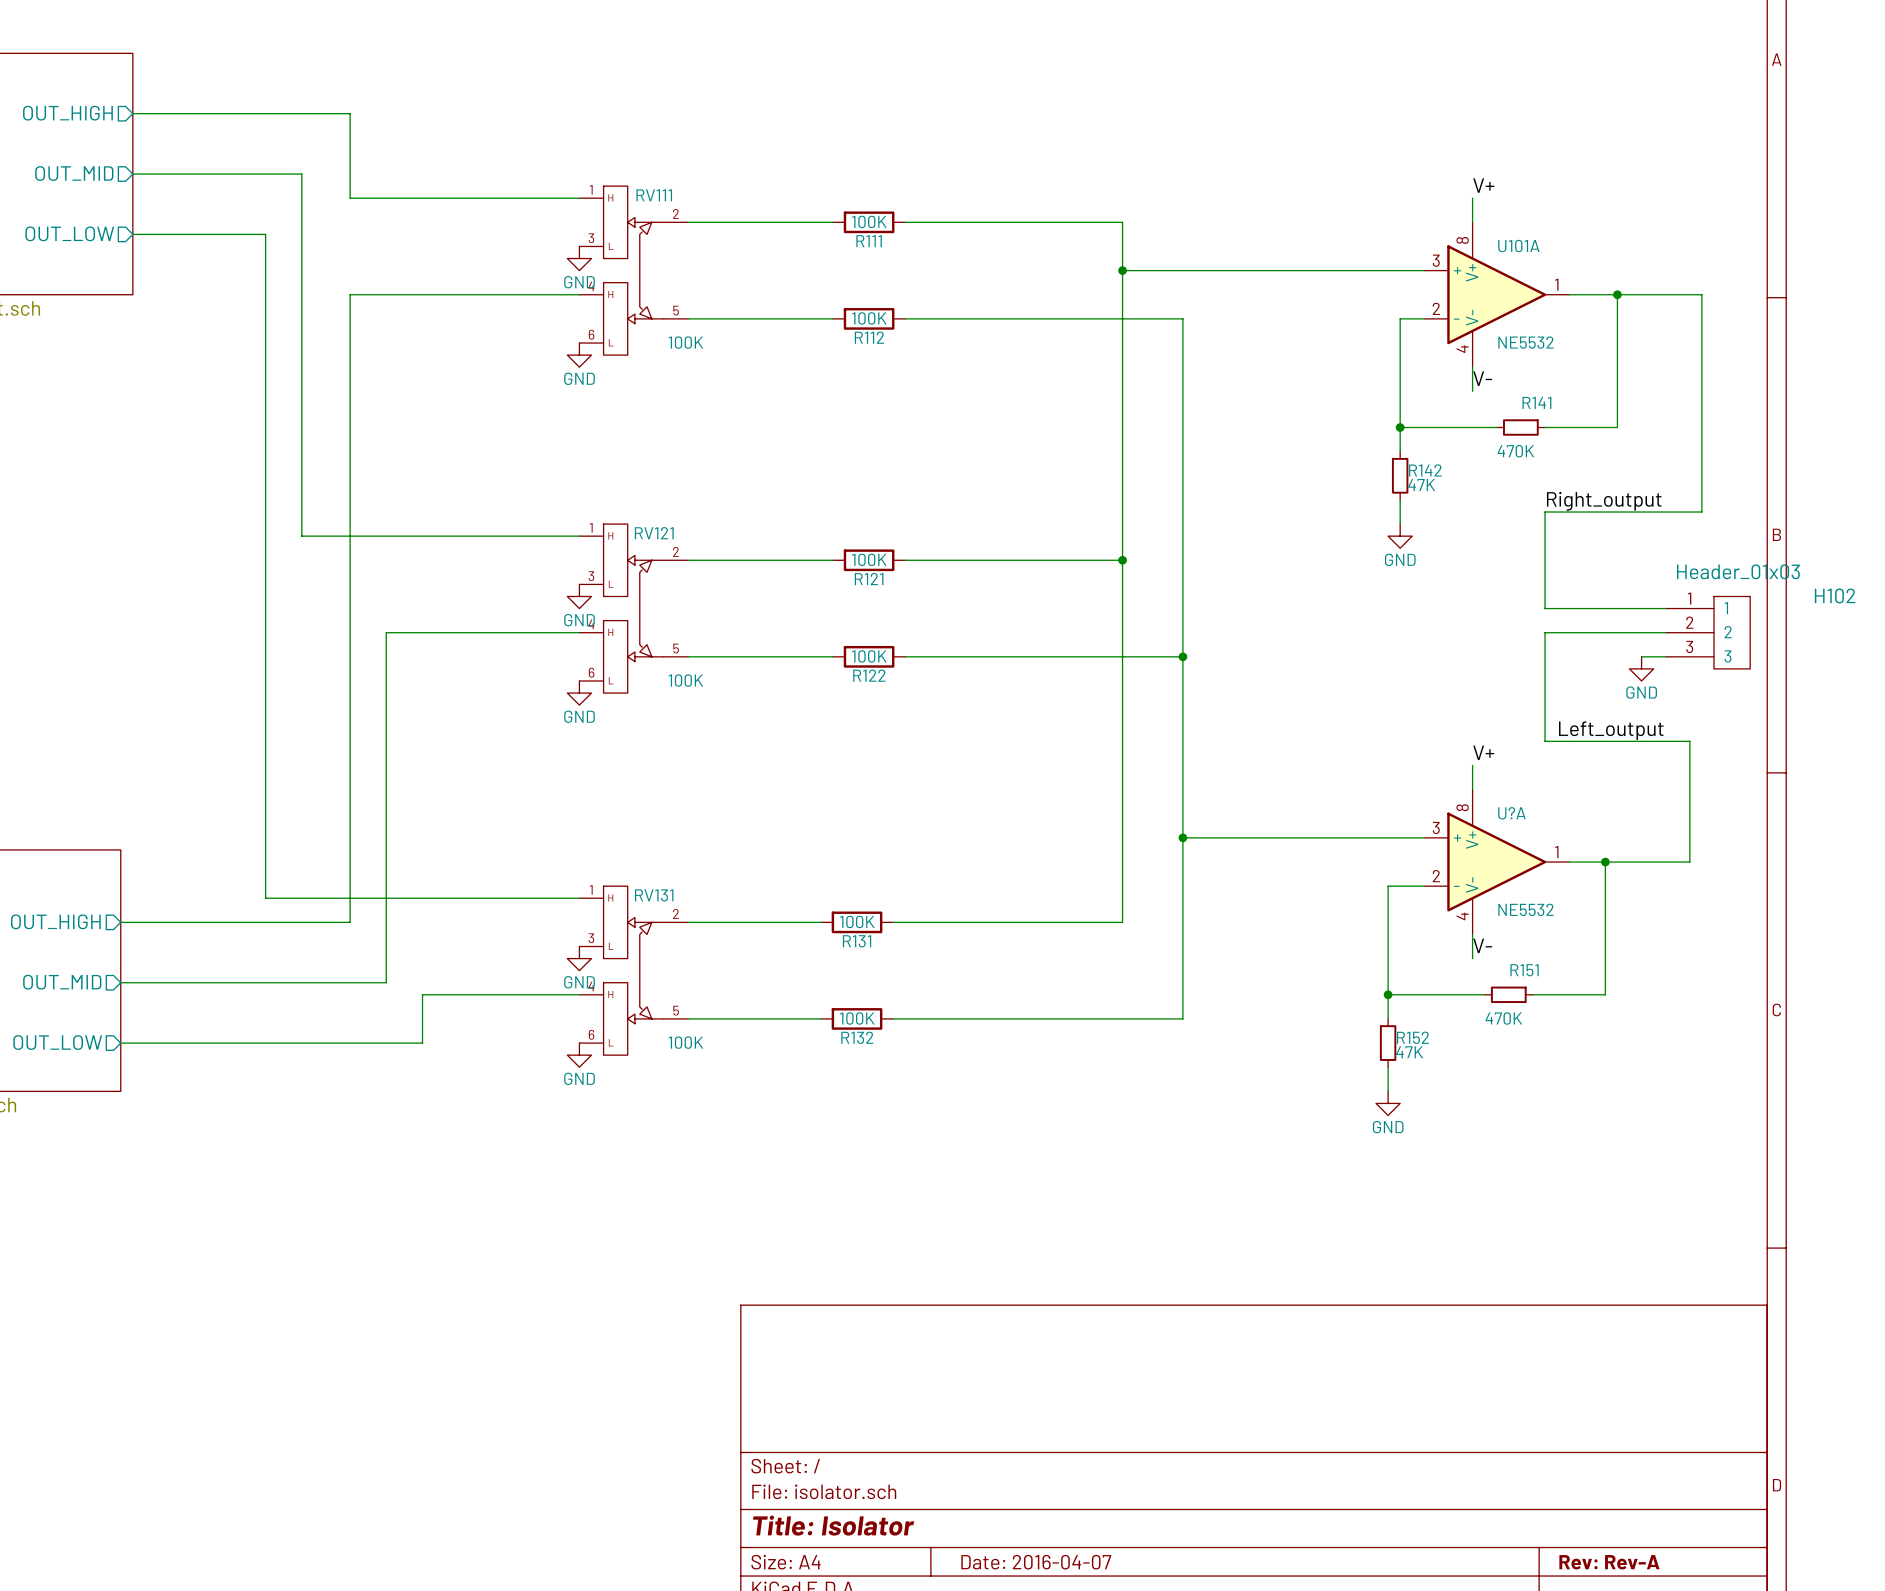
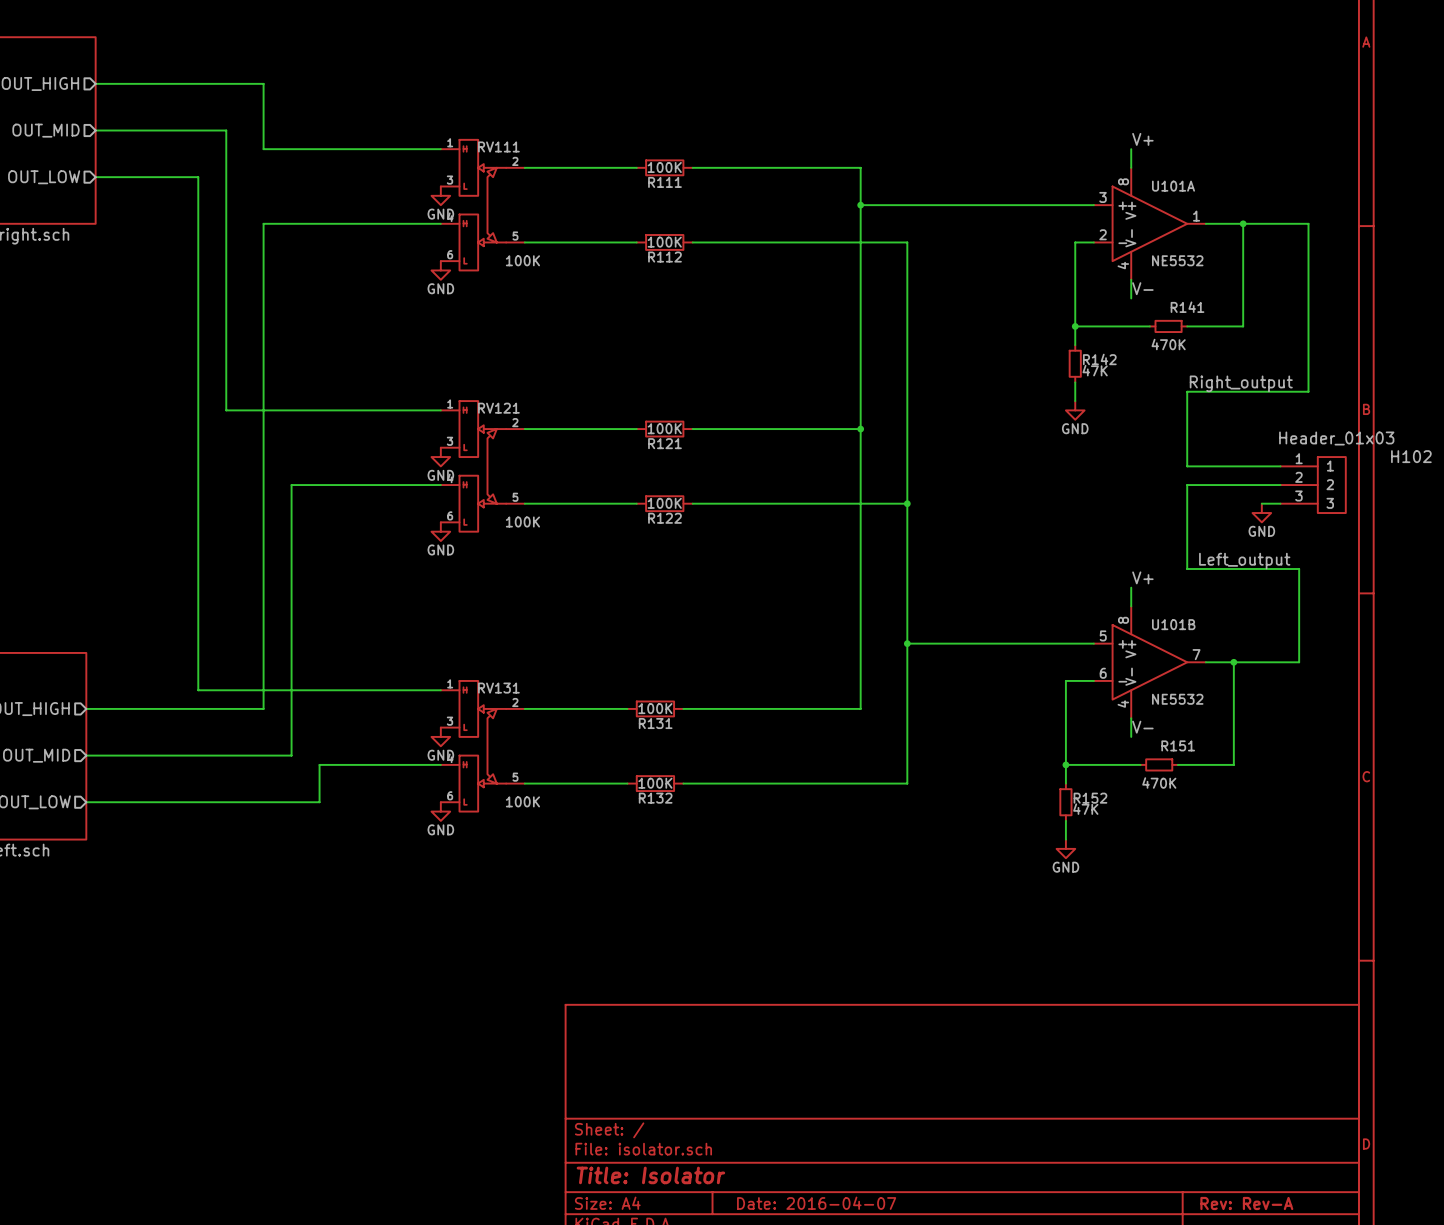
U?A name: U?A (1511, 813) -> U101B (1173, 624)
U?A pin number: 3 (1436, 828) -> 5 (1103, 635)
U?A pin number: 1 (1556, 852) -> 7 (1196, 654)
U?A pin number: 2 (1436, 876) -> 6 (1103, 673)

